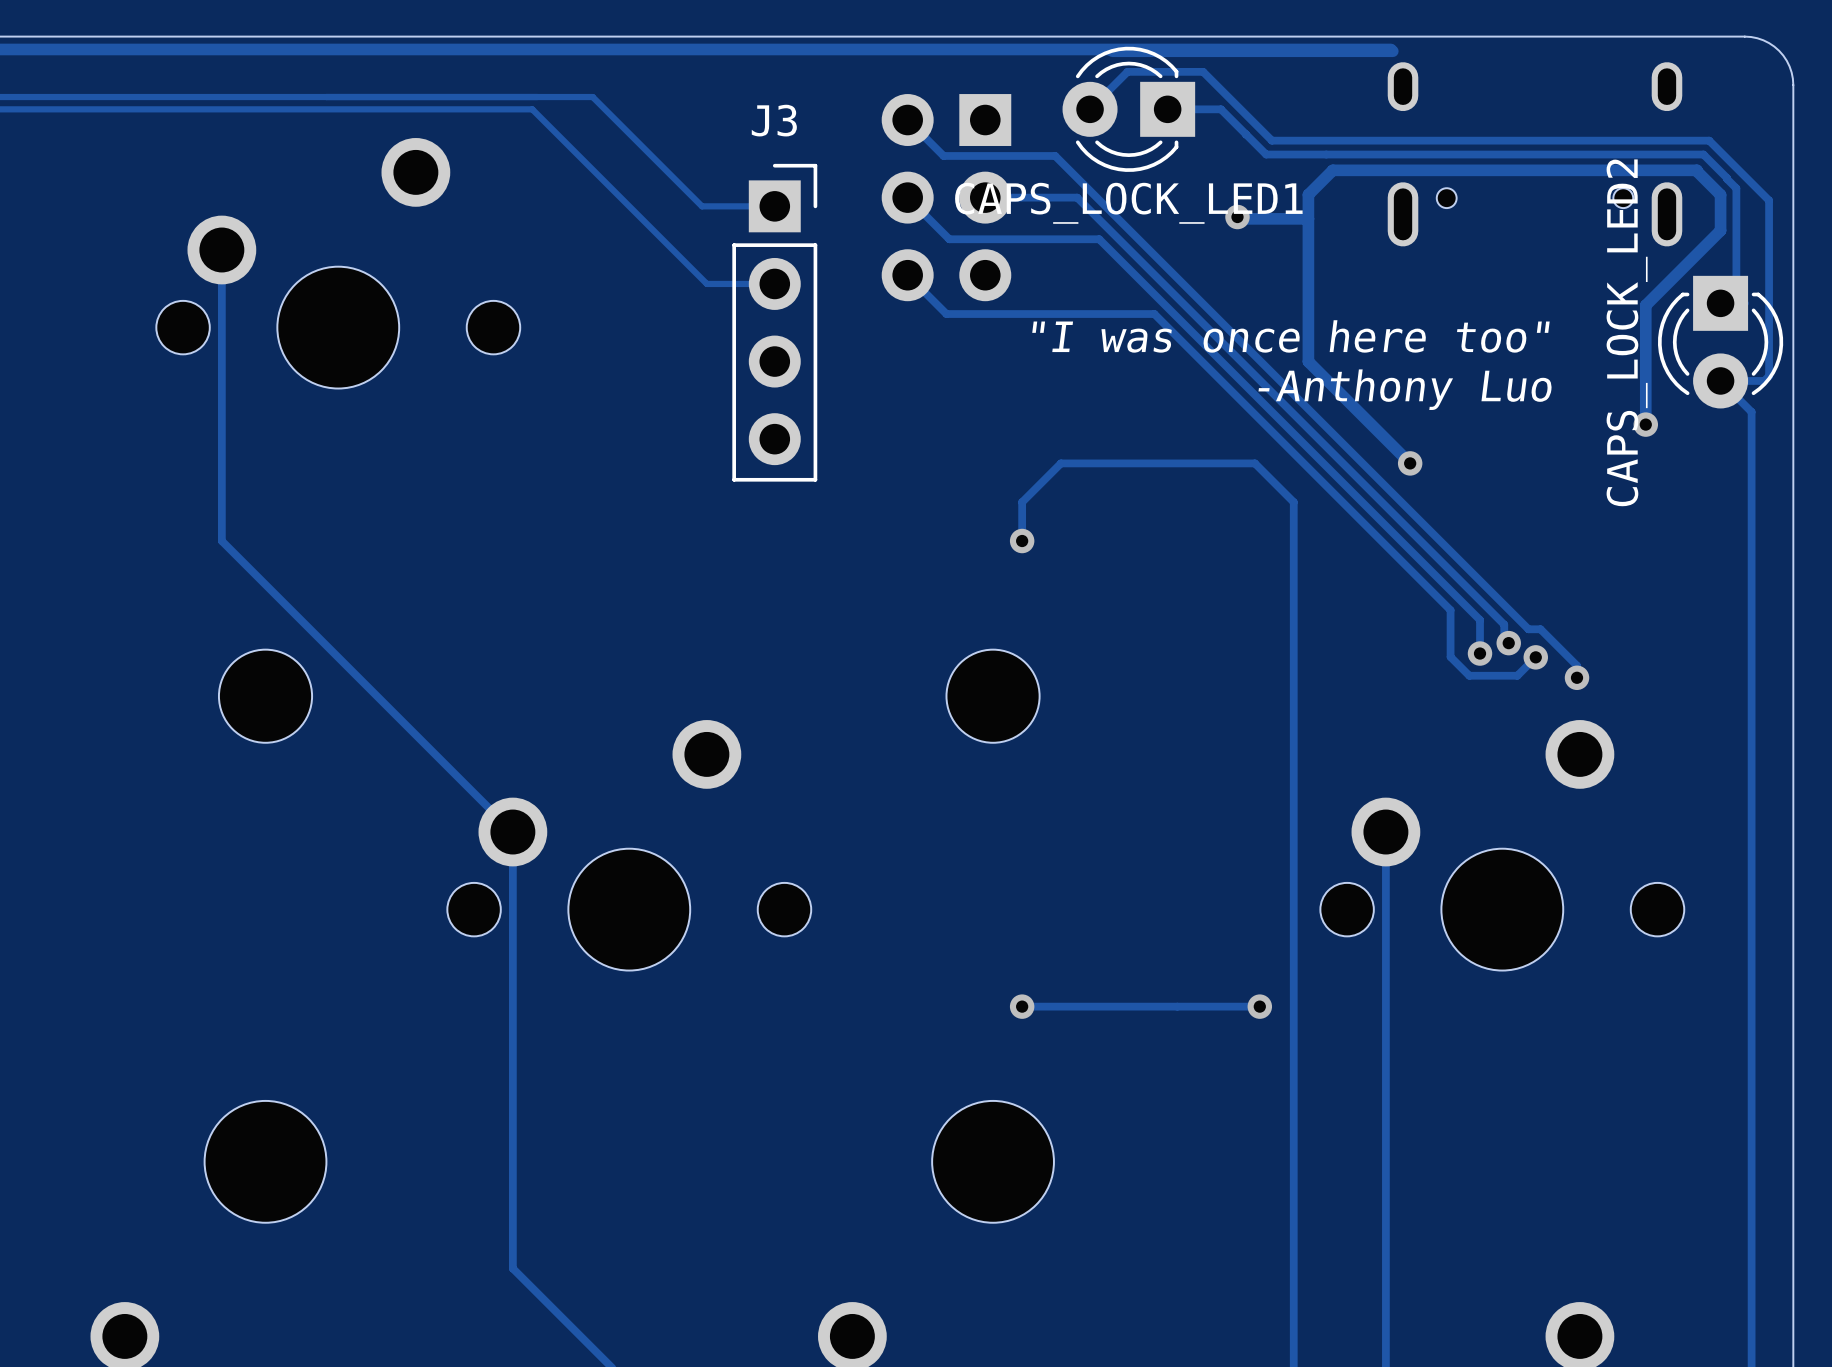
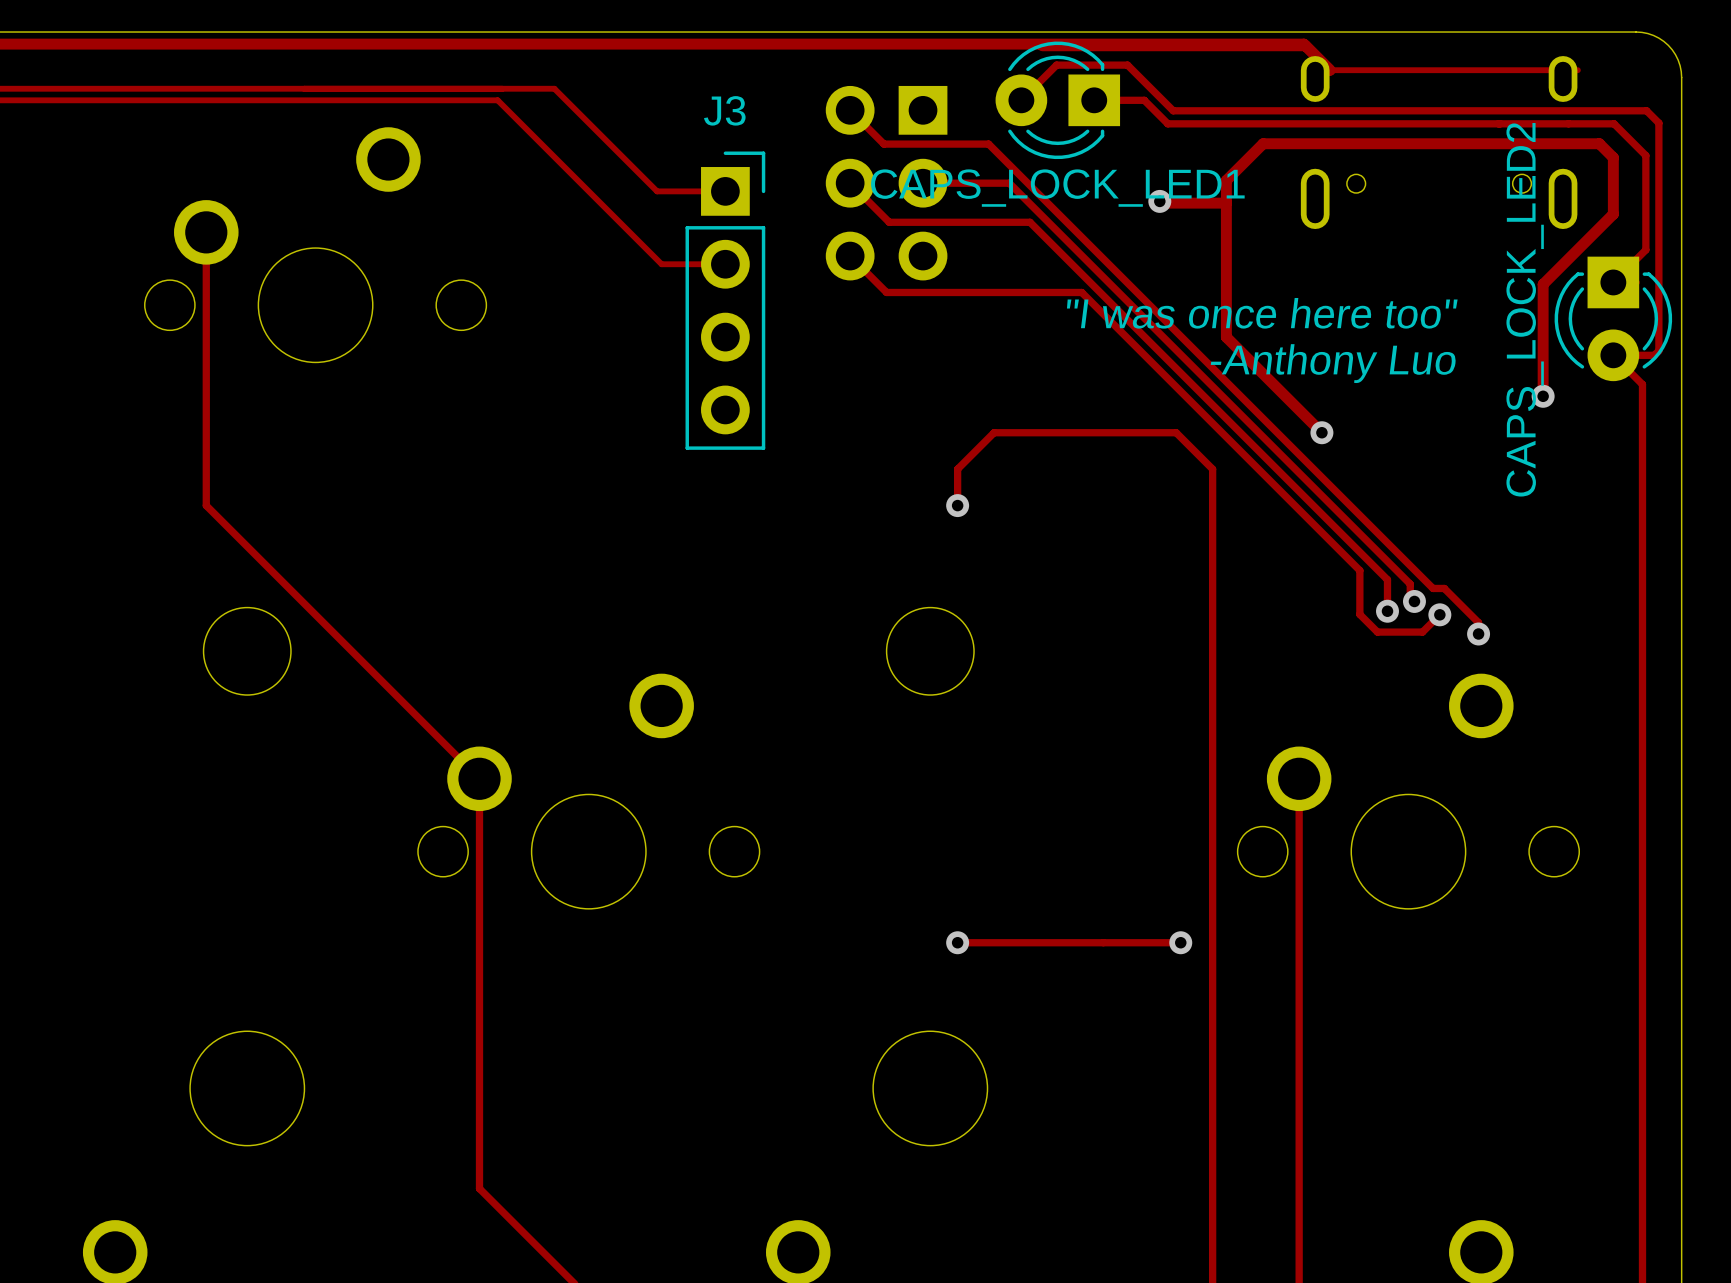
track: none -> (1303, 44) (1330, 70) (1577, 70)
track: (1251, 120) (1271, 140) (1709, 140) (1769, 200) -> (1173, 110) (1646, 110) (1658, 123) (1658, 185)
track: (1246, 134) (1266, 154) (1703, 154) (1736, 188) (1736, 287) -> (1167, 123) (1614, 123) (1645, 155) (1645, 249) (1628, 267)
track: (1332, 170) (1696, 170) (1720, 194) -> (1249, 157) (1263, 143) (1599, 143) (1613, 157) (1613, 180)

